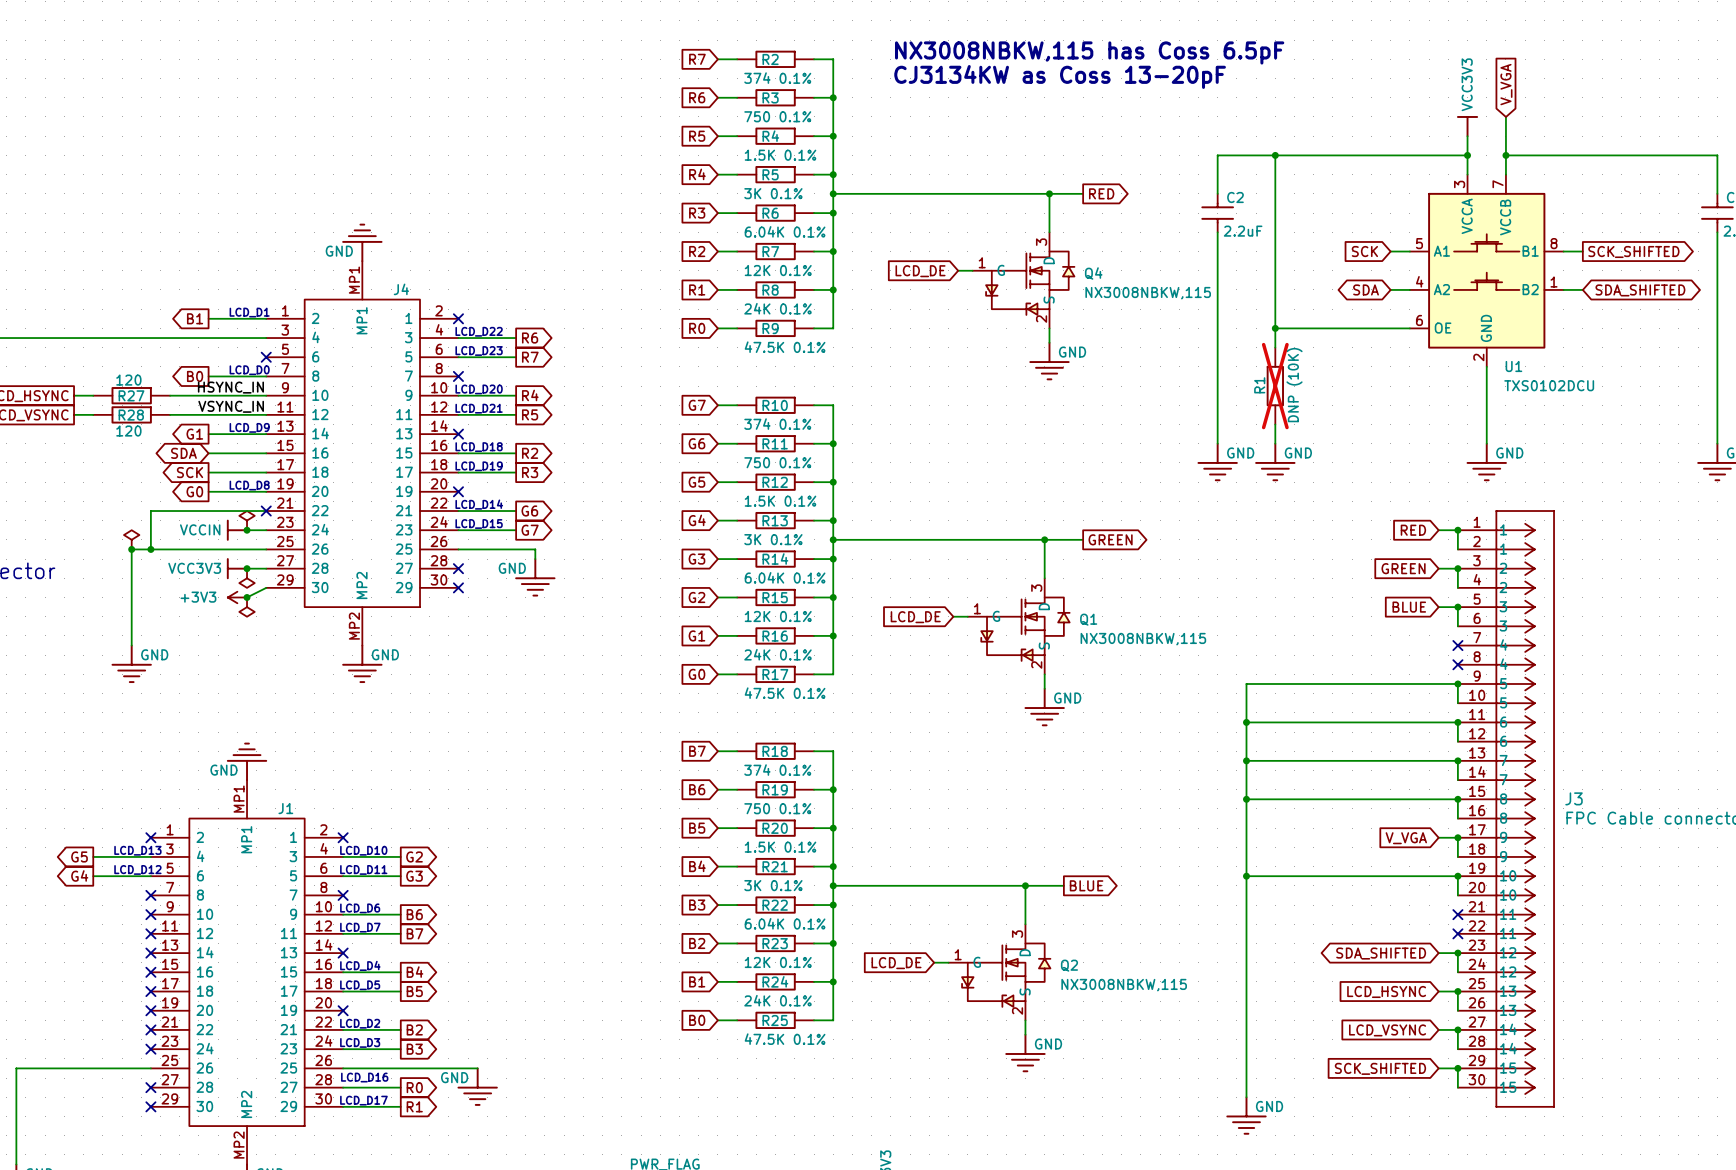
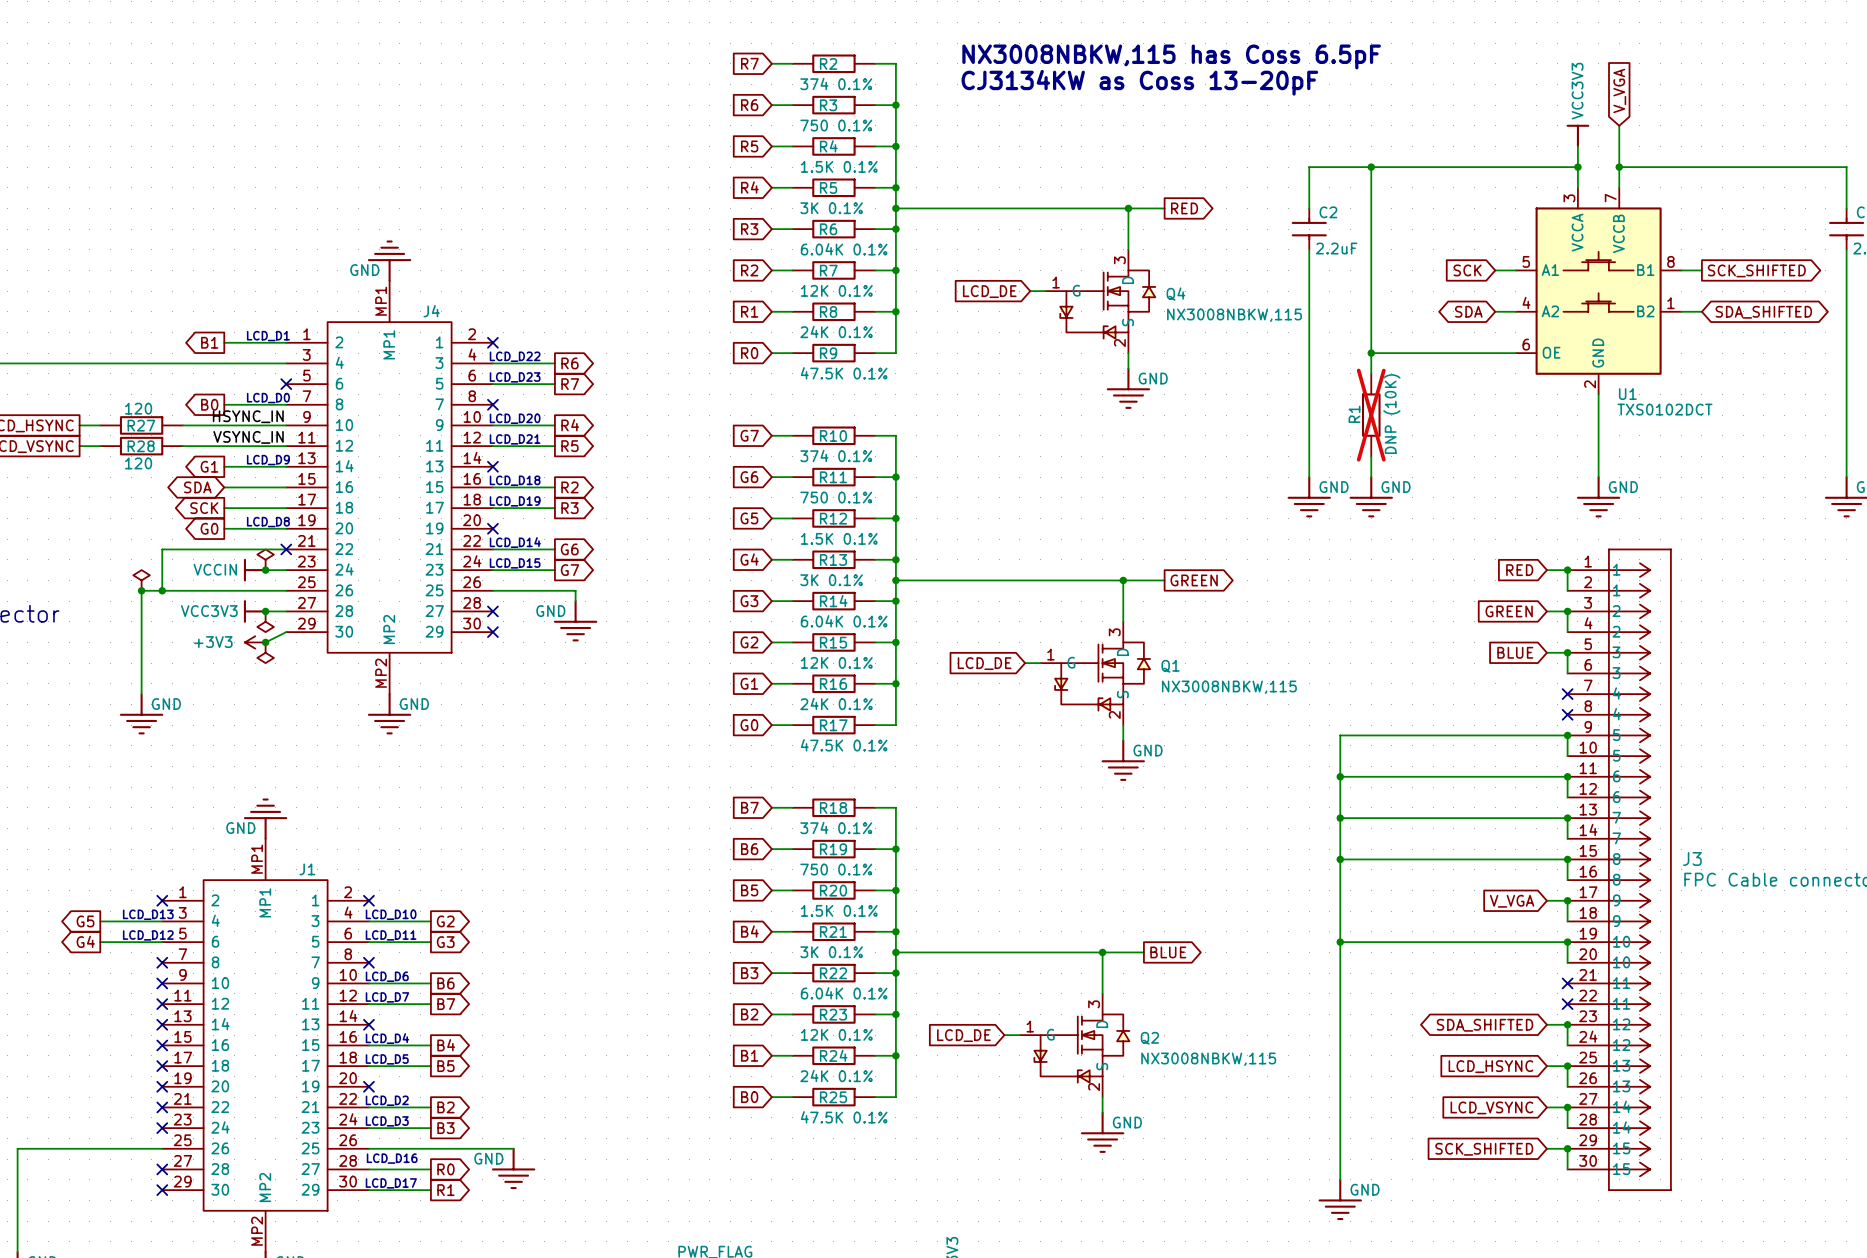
U1 value: TXS0102DCU (1549, 385) -> TXS0102DCT (1665, 409)

